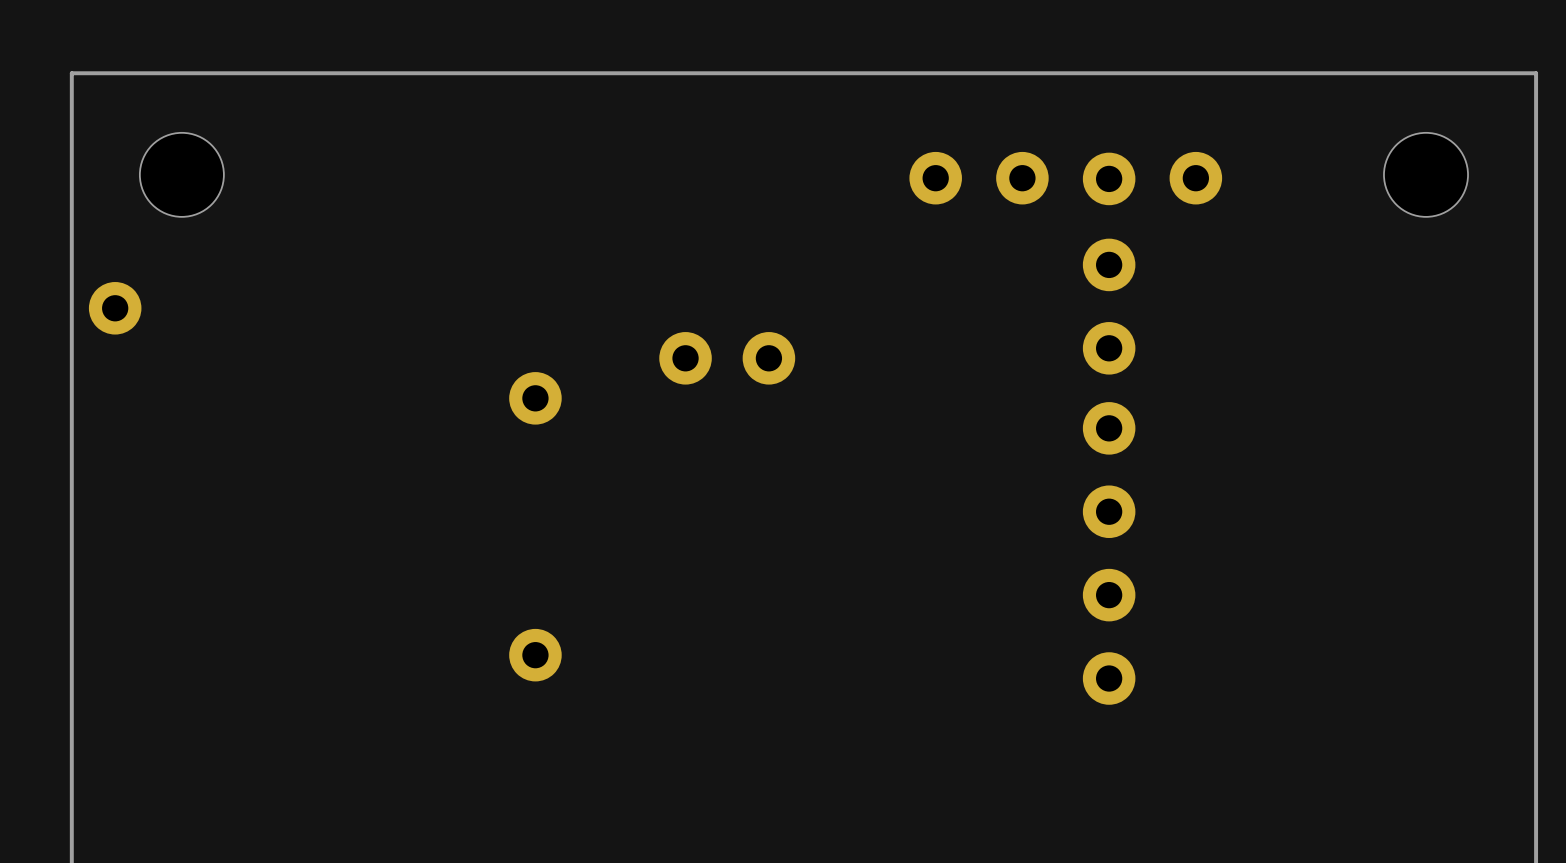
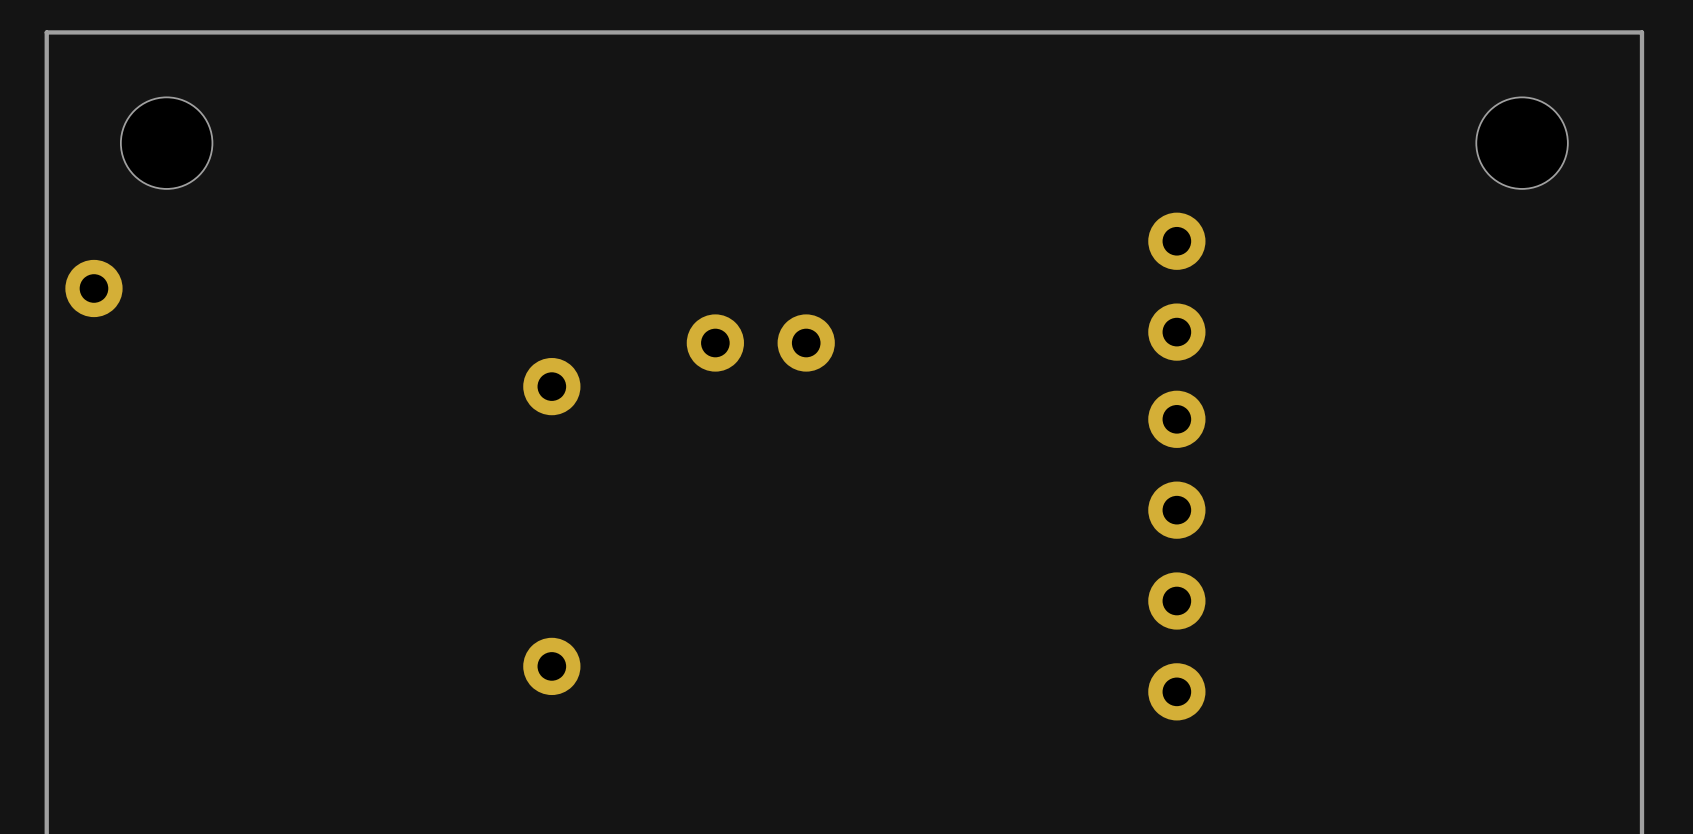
part: (935, 178) -> none
part: (1022, 178) -> none
part: (1109, 178) -> none
part: (1195, 178) -> none

